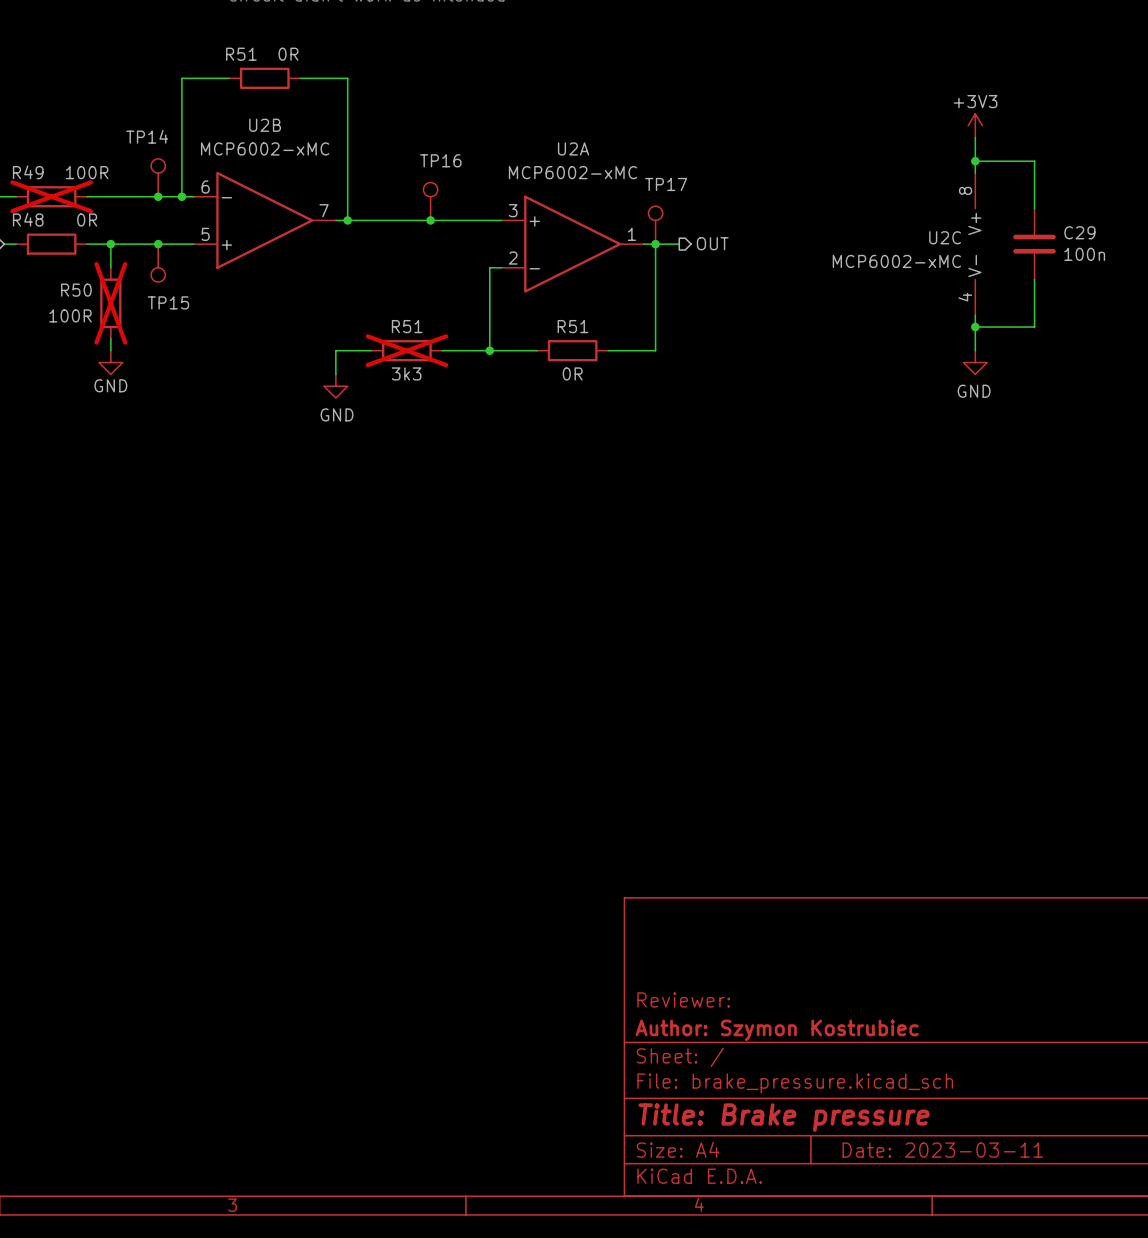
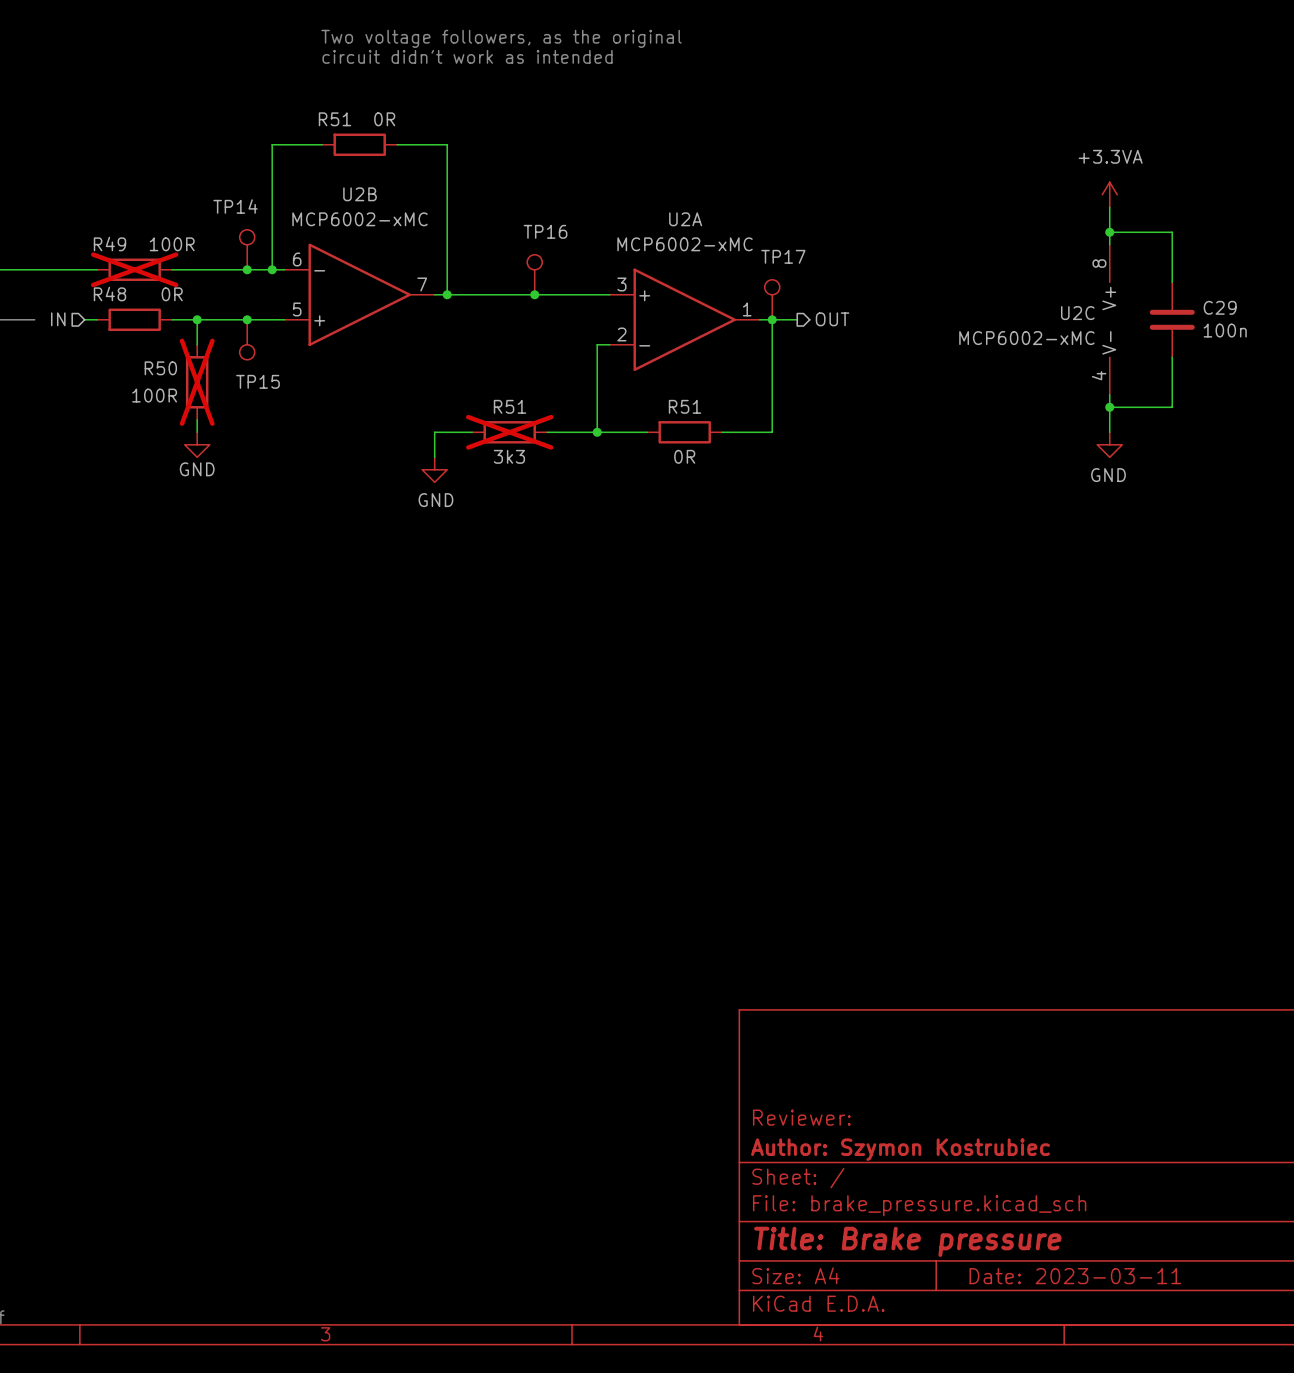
power symbol: +3V3 (975, 125) -> +3.3VA (1109, 194)

